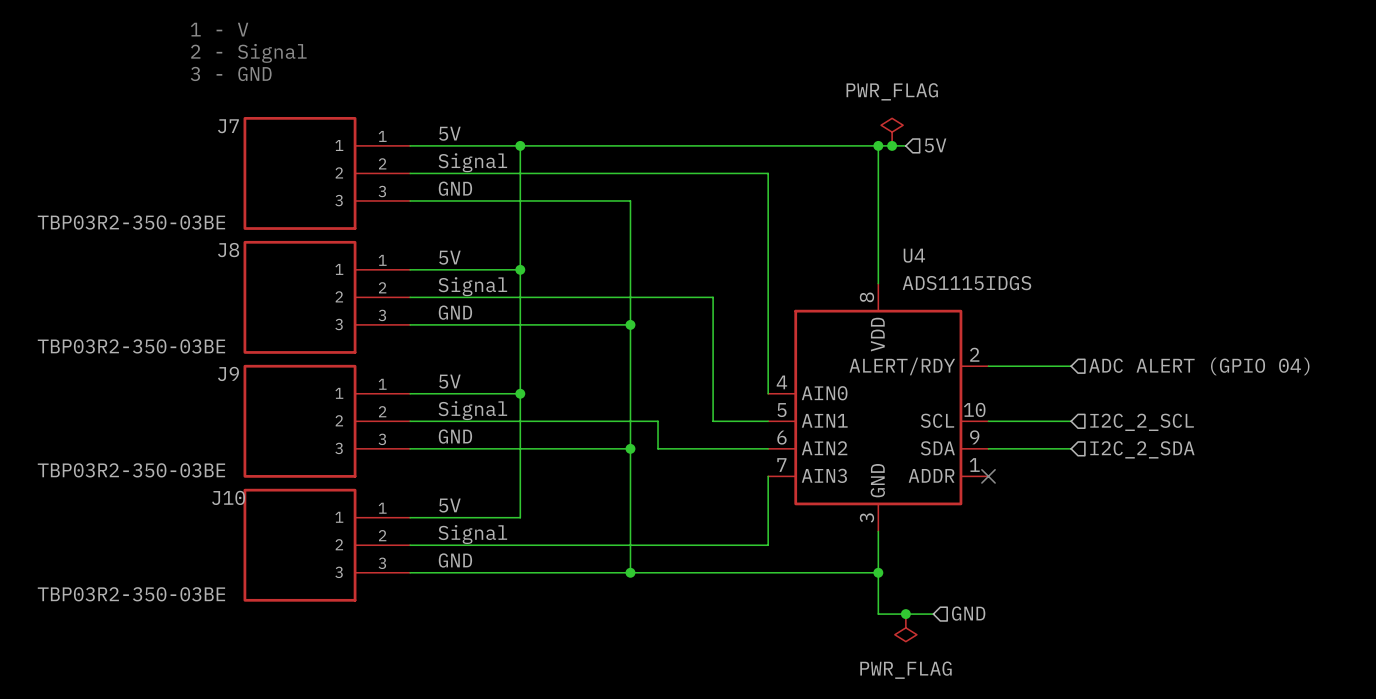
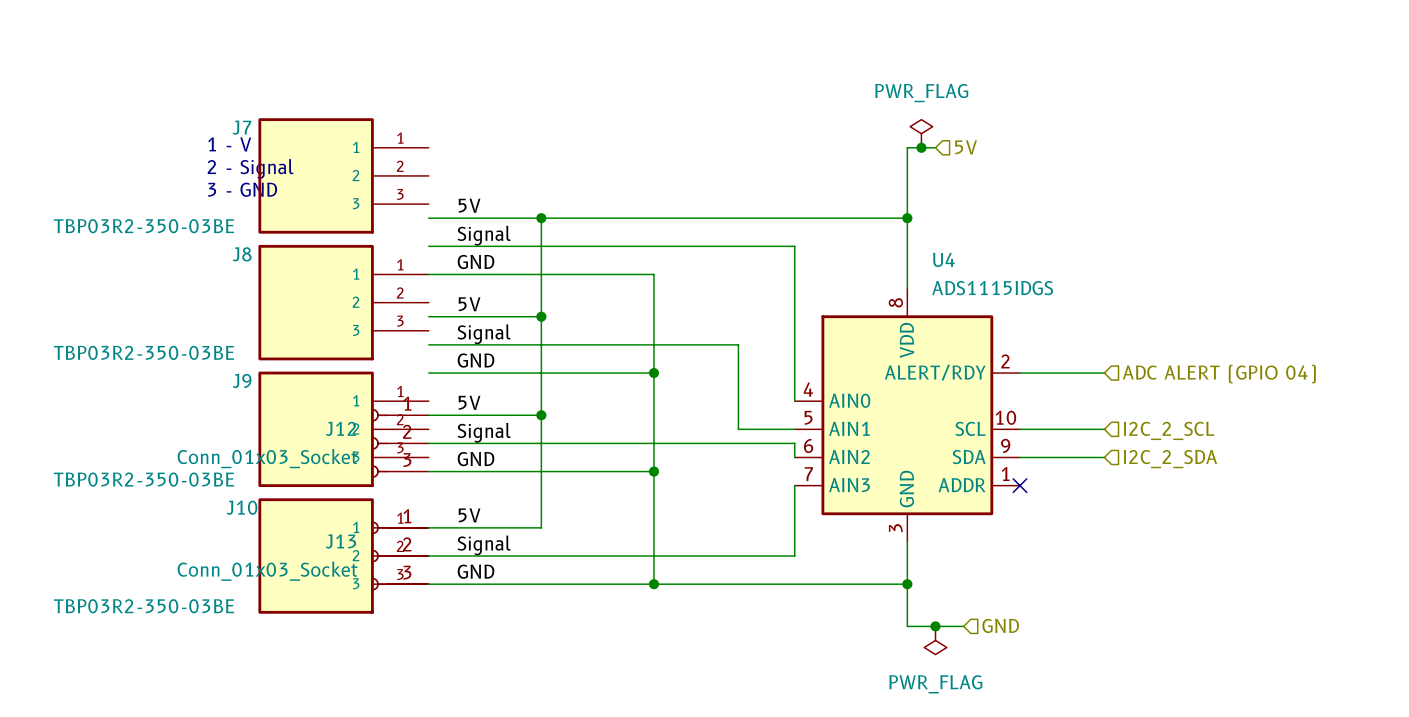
text position: 1 - V (219, 29) -> 1 - V (229, 144)
text position: 2 - Signal (248, 53) -> 2 - Signal (250, 168)
text position: 3 - GND (231, 73) -> 3 - GND (242, 189)
label position: 5V (449, 133) -> 5V (469, 205)
wire: (410, 145) (878, 145) -> (428, 218) (907, 218)
wire: (520, 145) (520, 214) -> none
junction: (520, 145) -> none
junction: (878, 145) -> none
label: Signal (472, 162) -> none
wire: (410, 173) (768, 173) (768, 242) -> (428, 246) (794, 246)
label: GND (455, 188) -> none
wire: (410, 200) (630, 200) (630, 269) -> (541, 274) (653, 274)
junction: none -> (541, 218)
junction: none -> (907, 218)
label: none -> Signal (484, 235)
label: 5V (449, 257) -> GND (476, 262)
junction: (520, 269) -> none
label: Signal (472, 286) -> none
wire: (410, 297) (713, 297) (713, 338) -> (428, 344) (738, 344)
label: none -> 5V (469, 304)
wire: none -> (428, 316) (541, 316)
junction: none -> (541, 316)
label: GND (455, 312) -> none
wire: (410, 324) (630, 324) -> (428, 373) (653, 373)
junction: (630, 324) -> none
label: none -> Signal (484, 334)
label: none -> GND (476, 360)
junction: none -> (653, 373)
label position: 5V (449, 381) -> 5V (469, 402)
wire: (410, 393) (520, 393) -> (428, 415) (541, 415)
junction position: (520, 393) -> (541, 415)
label position: Signal (472, 410) -> Signal (484, 432)
wire: (410, 421) (658, 421) (658, 448) (768, 448) -> (428, 443) (794, 443) (794, 457)
J12: none -> Conn_01x03_Socket (400, 443)
label position: GND (455, 436) -> GND (476, 459)
wire: (410, 448) (630, 448) -> (428, 471) (653, 471)
junction position: (630, 448) -> (653, 471)
J13: none -> Conn_01x03_Socket (400, 556)

